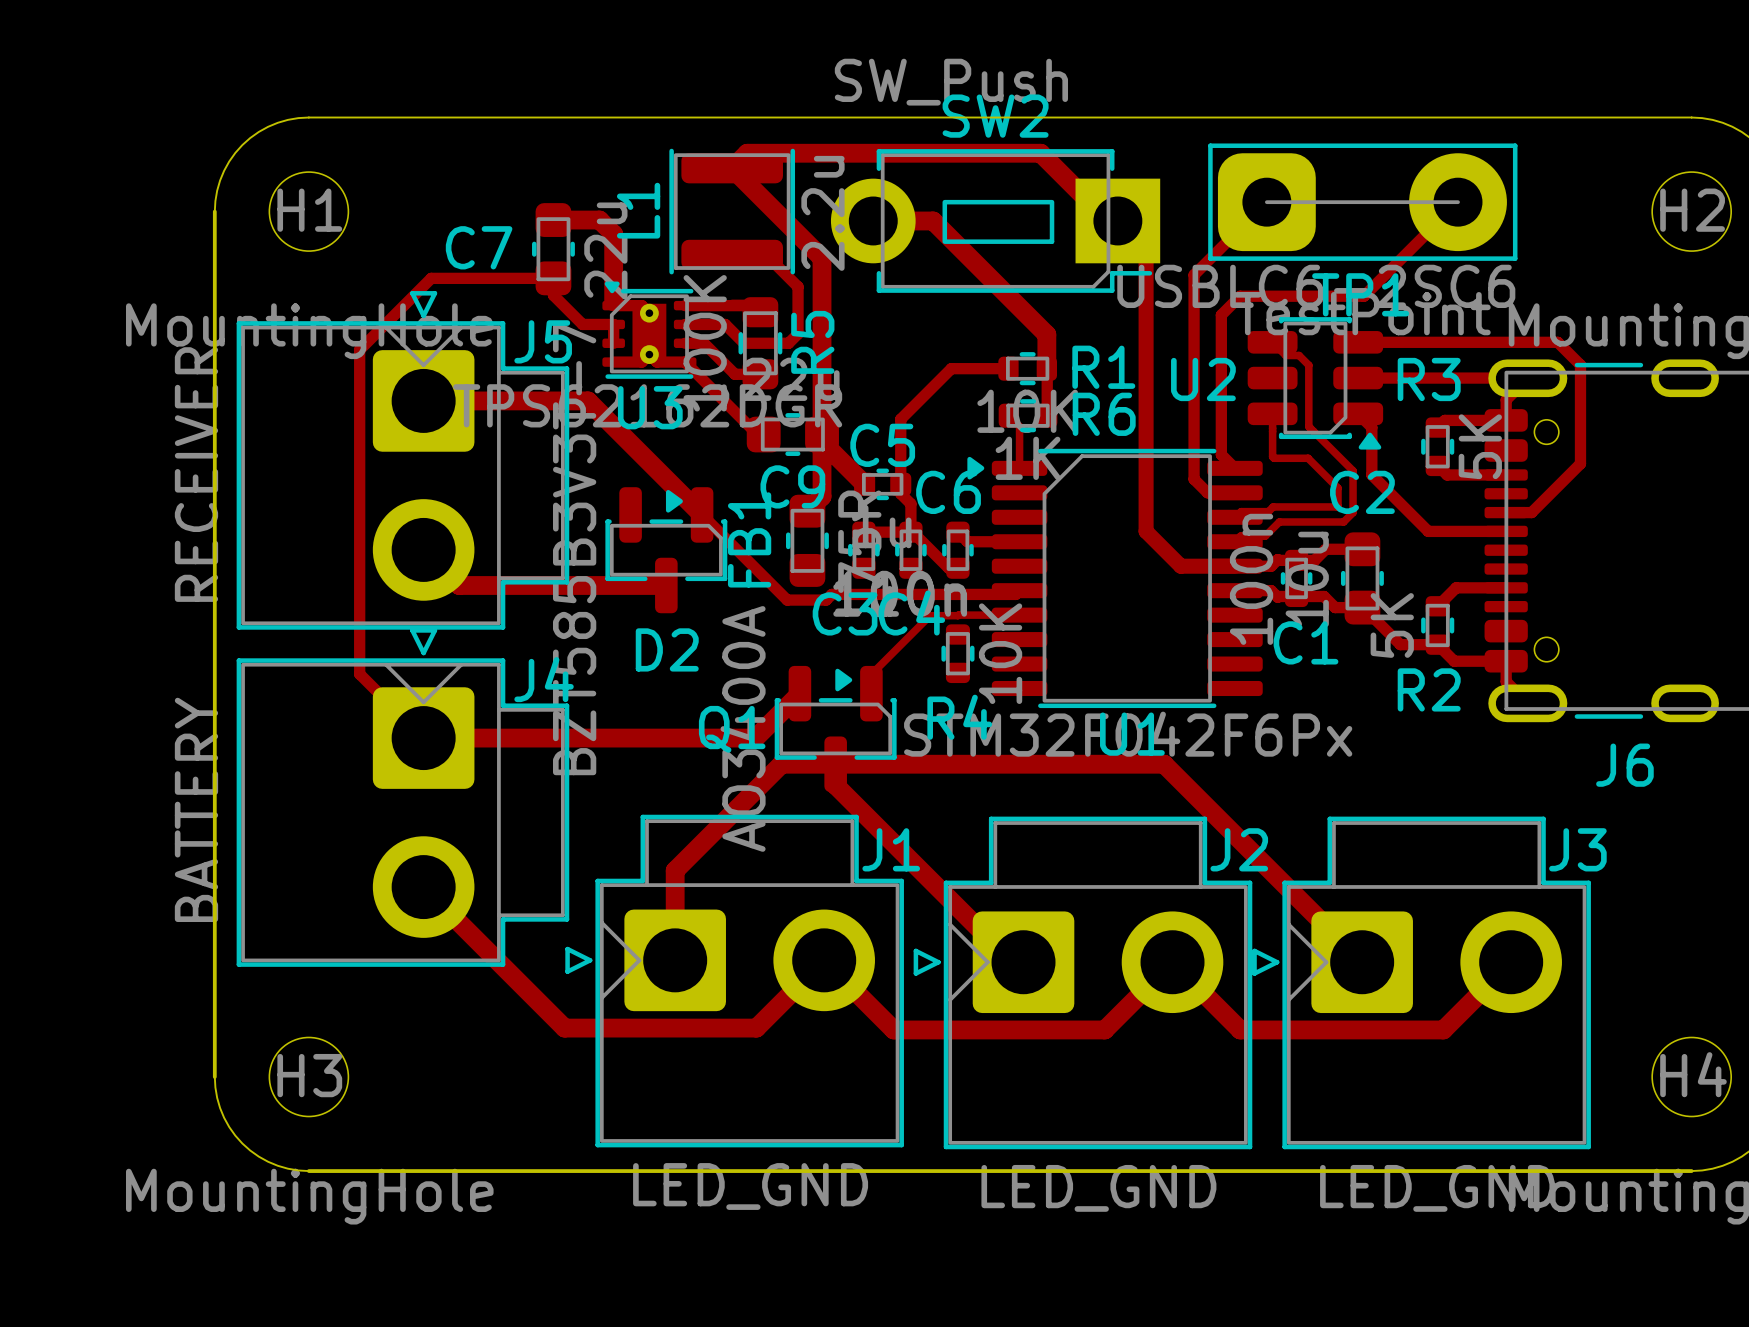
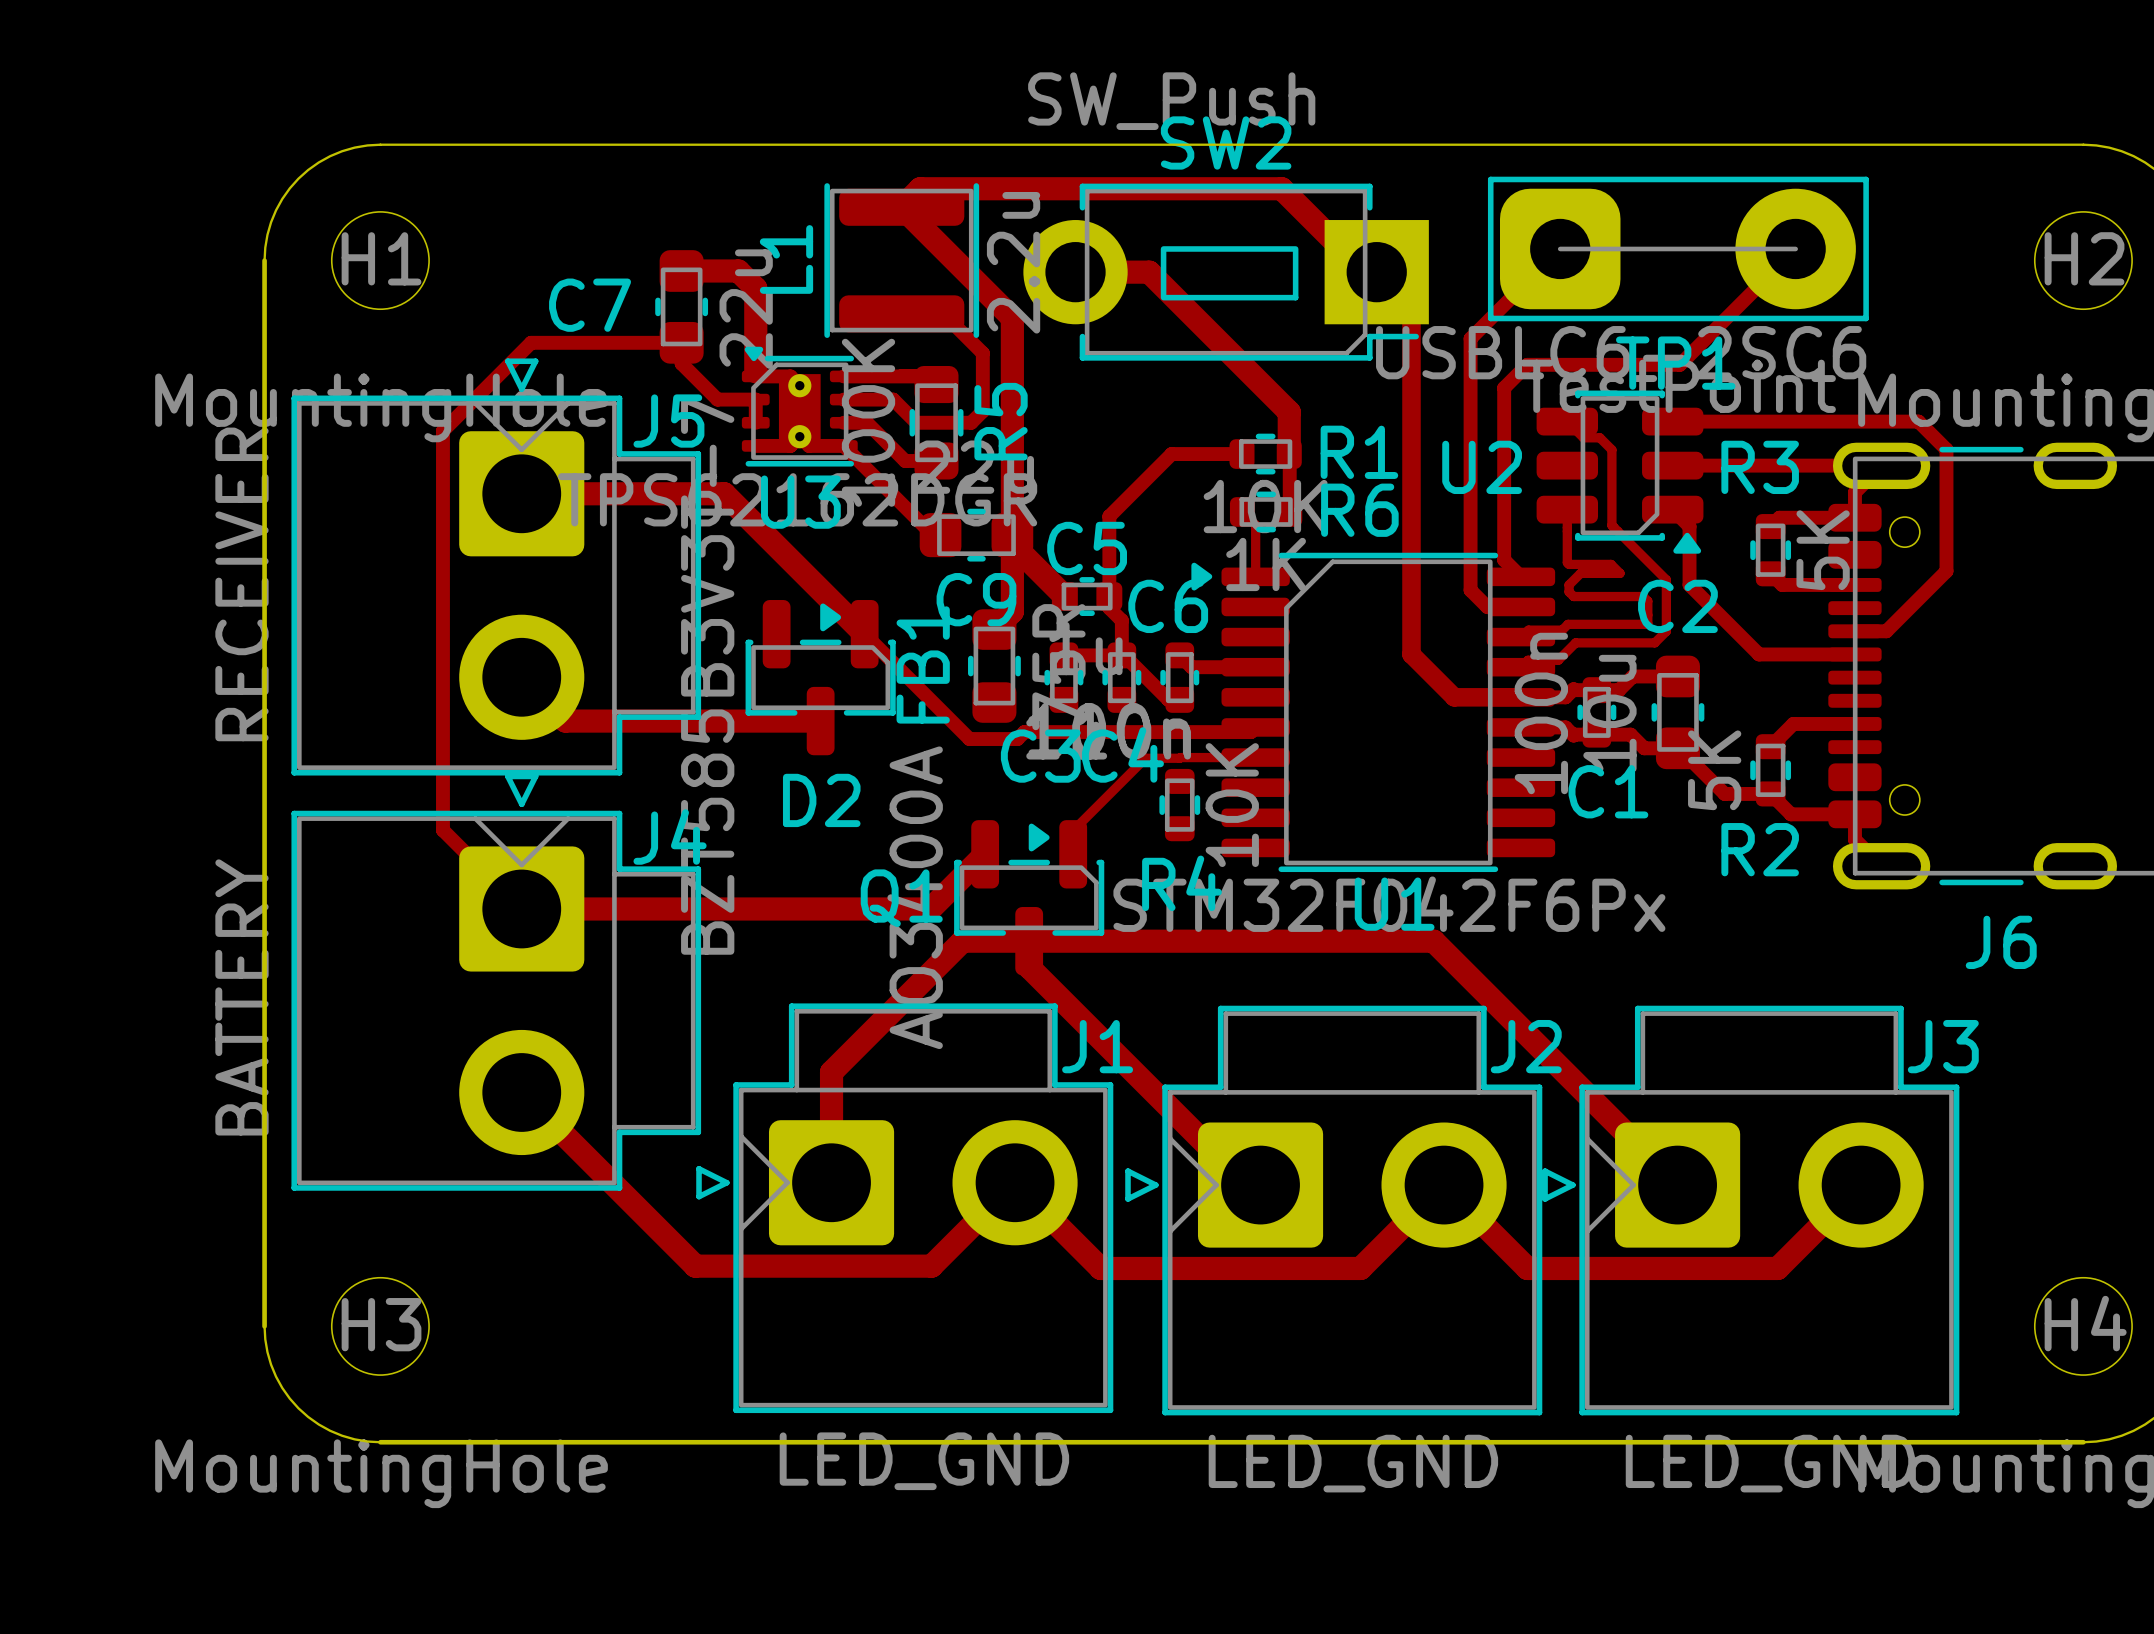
track: (1315, 465) (1334, 484) -> (1620, 573) (1580, 573) (1569, 584) (1569, 591) (1573, 596) (1643, 596)

